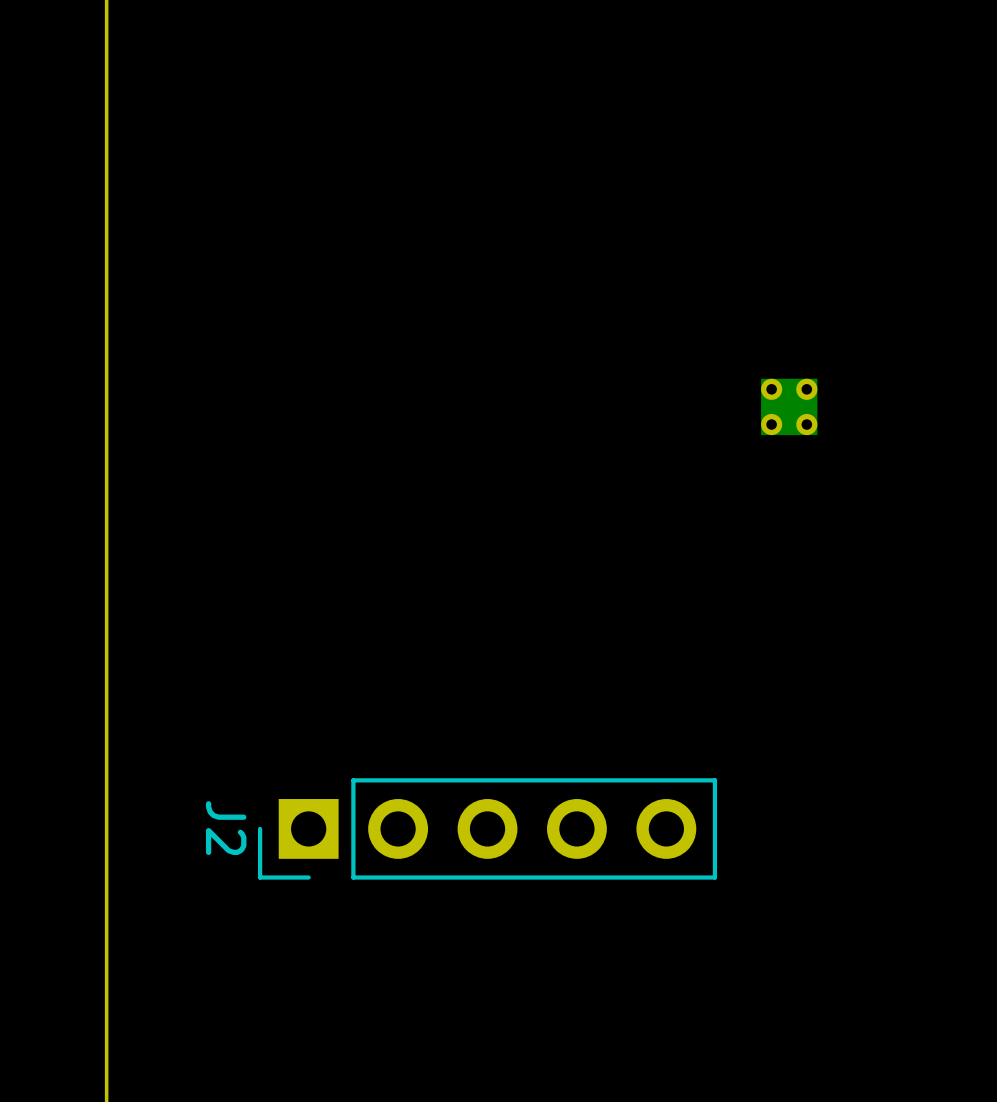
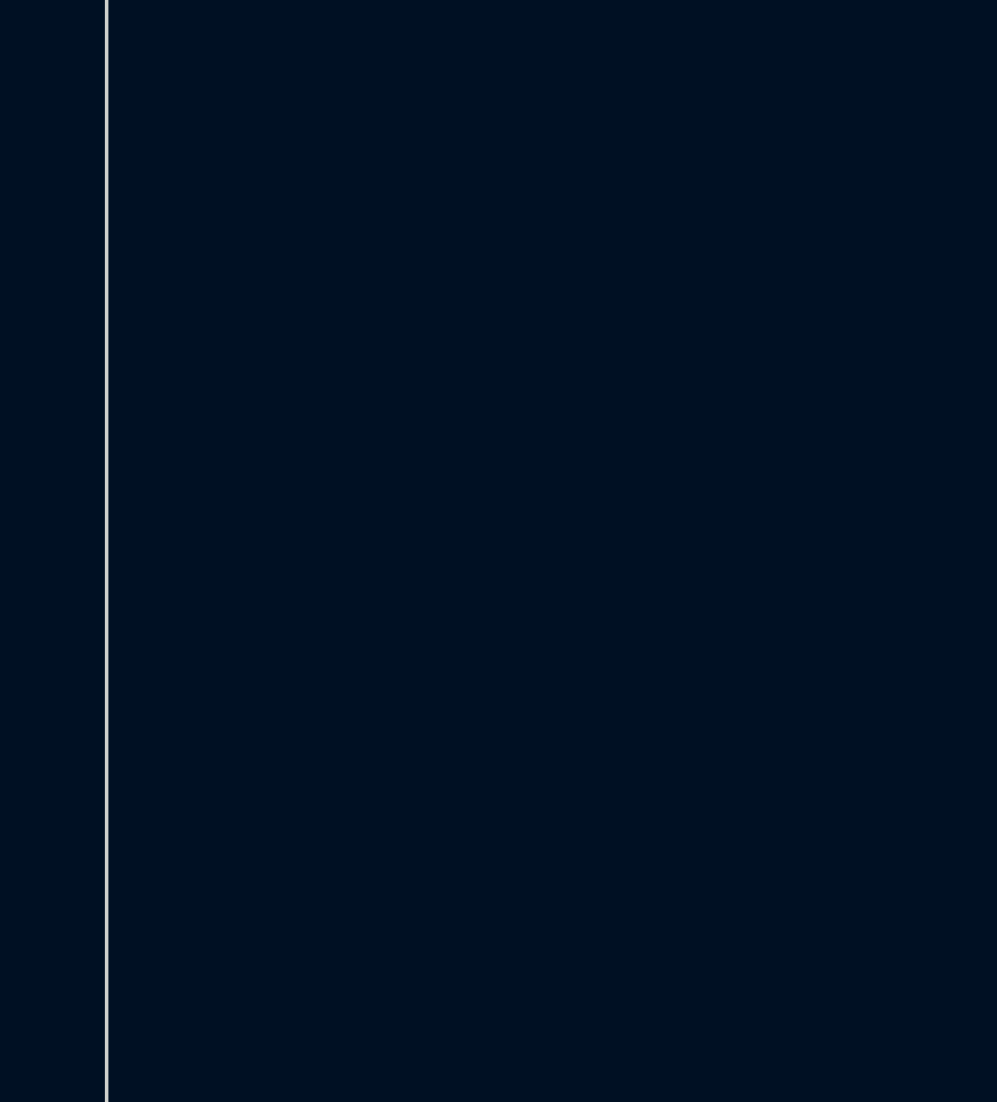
part: (789, 406) -> none
J2: (487, 828) -> none

